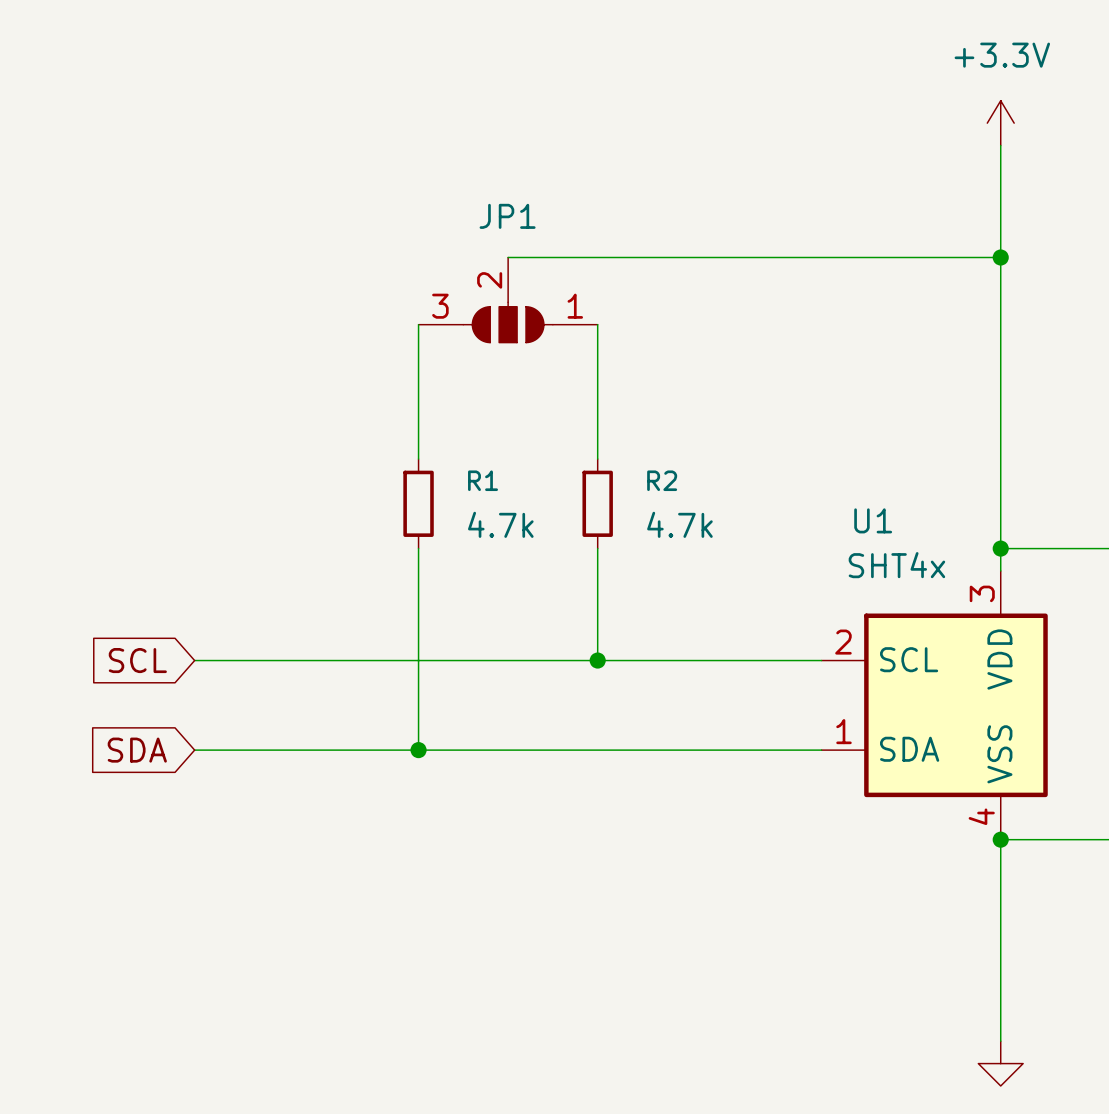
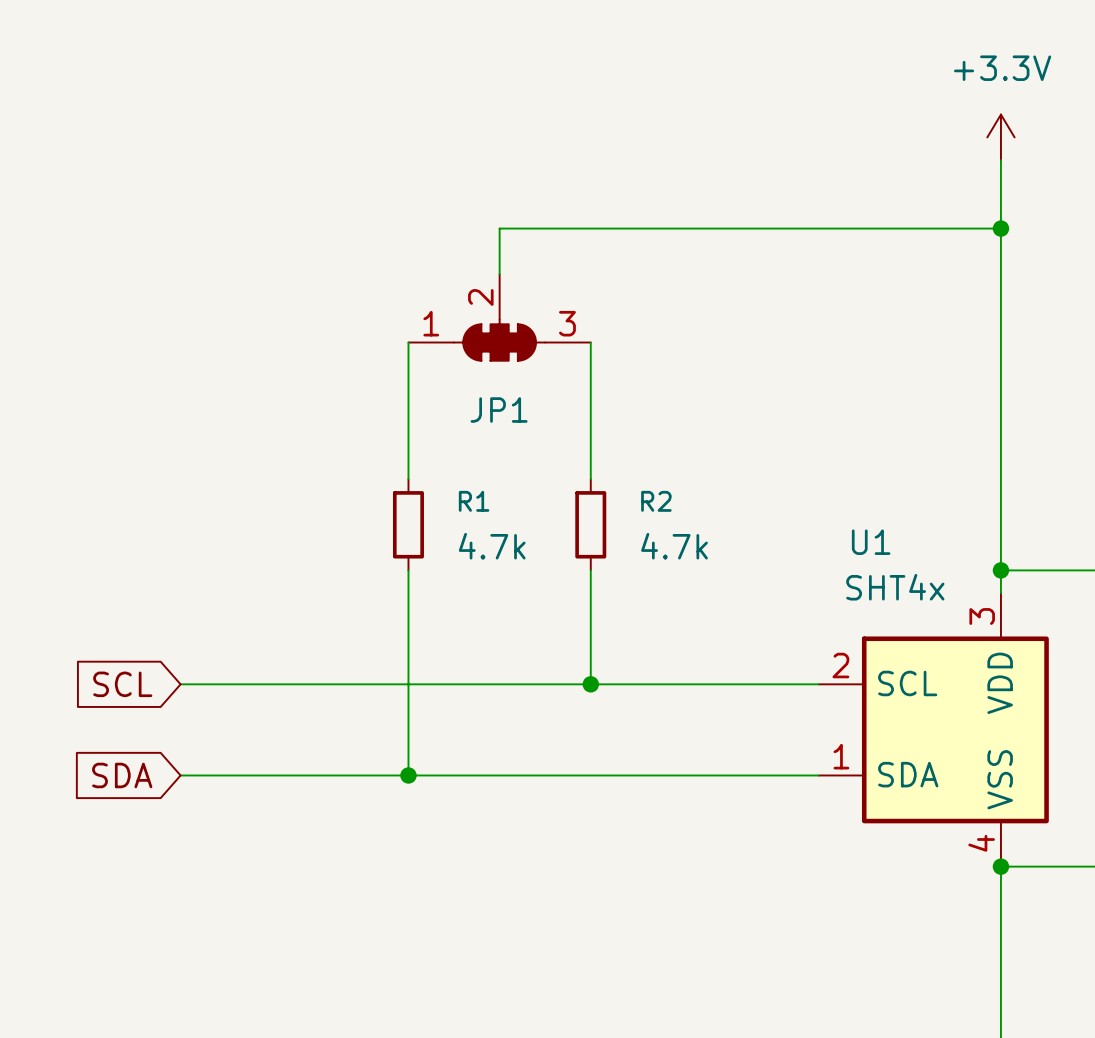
JP1 name position: JP1 (507, 216) -> JP1 (499, 410)
JP1 symbol: [418, 257, 598, 343] -> [408, 274, 591, 361]
wire: (508, 257) (1000, 257) -> (499, 274) (499, 228) (1000, 228)
junction position: (1000, 257) -> (1000, 228)

